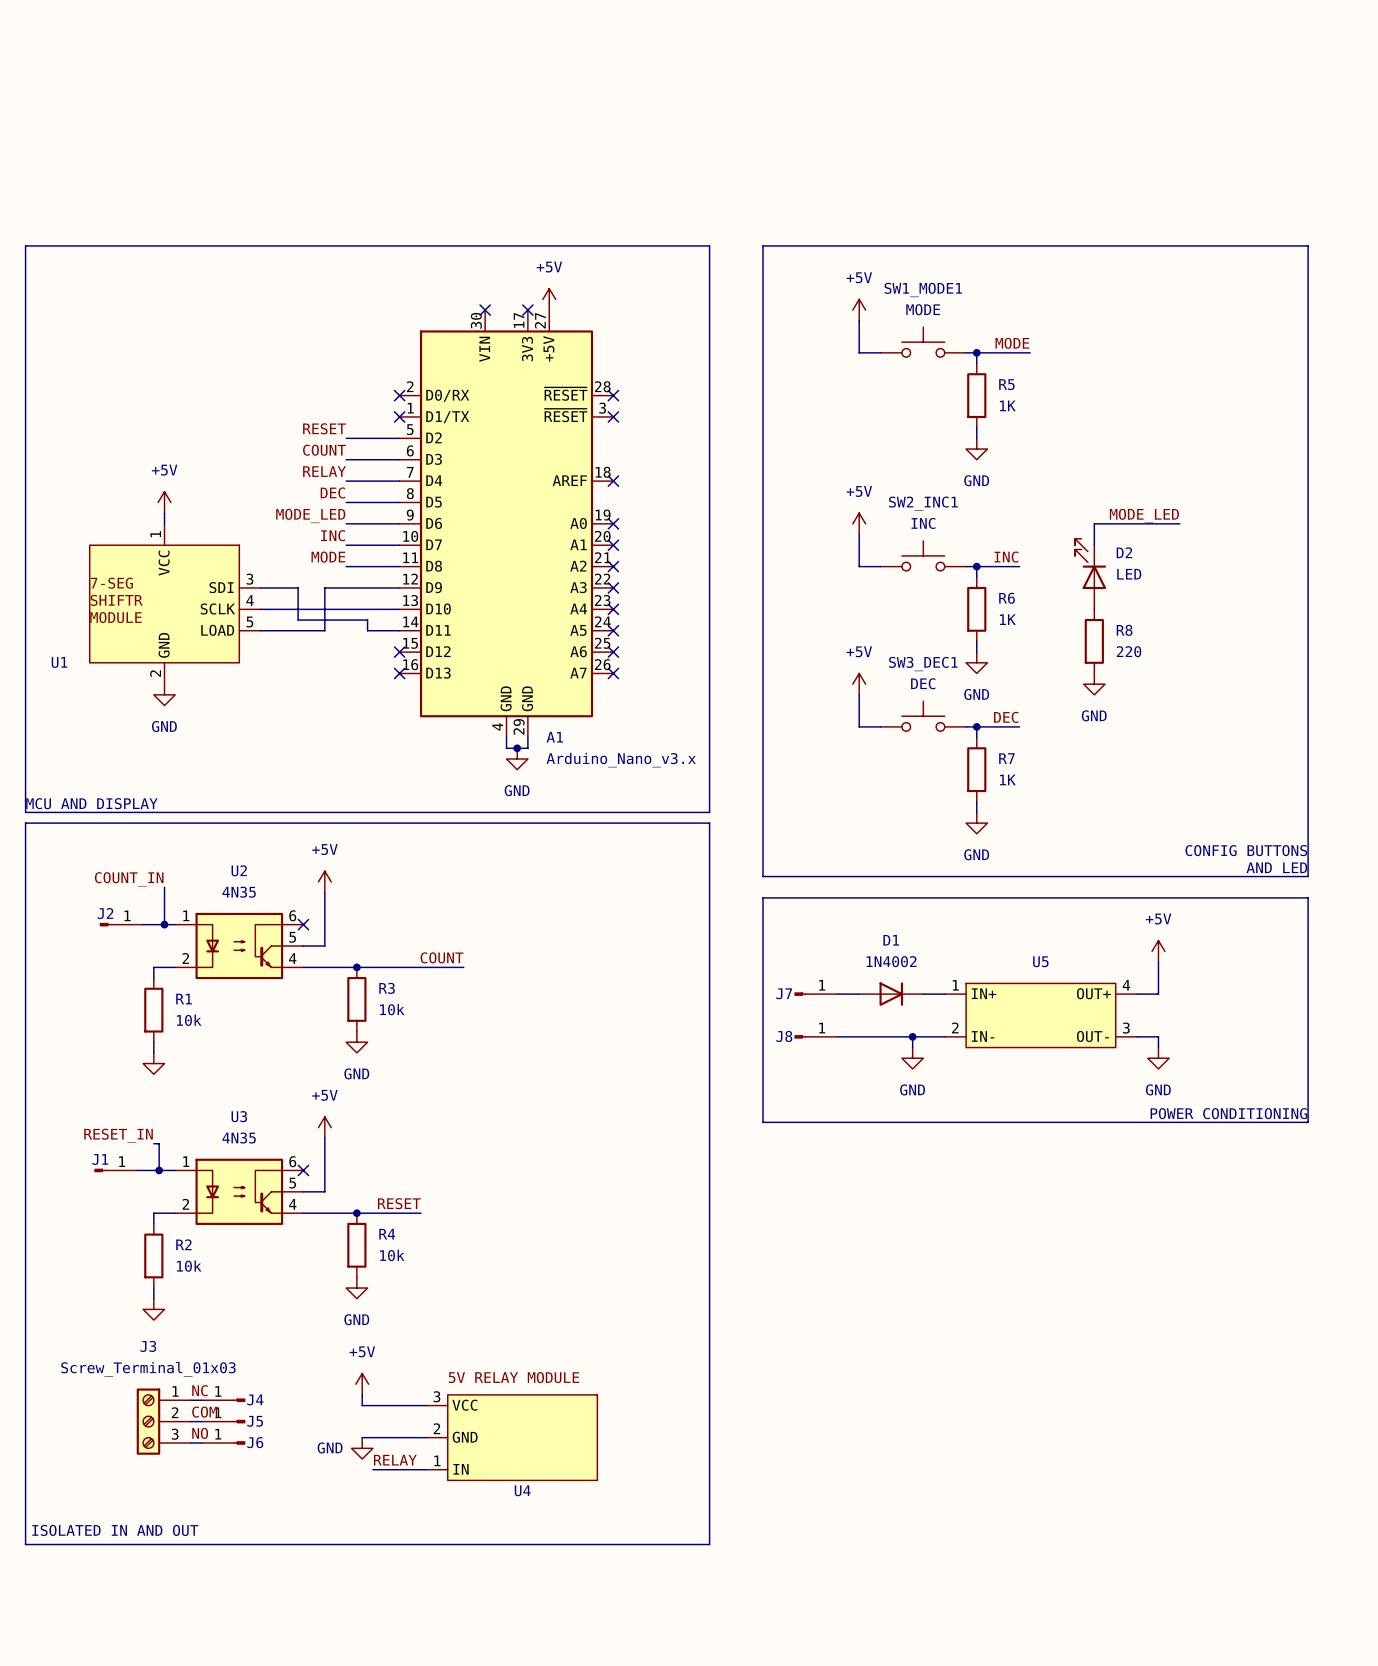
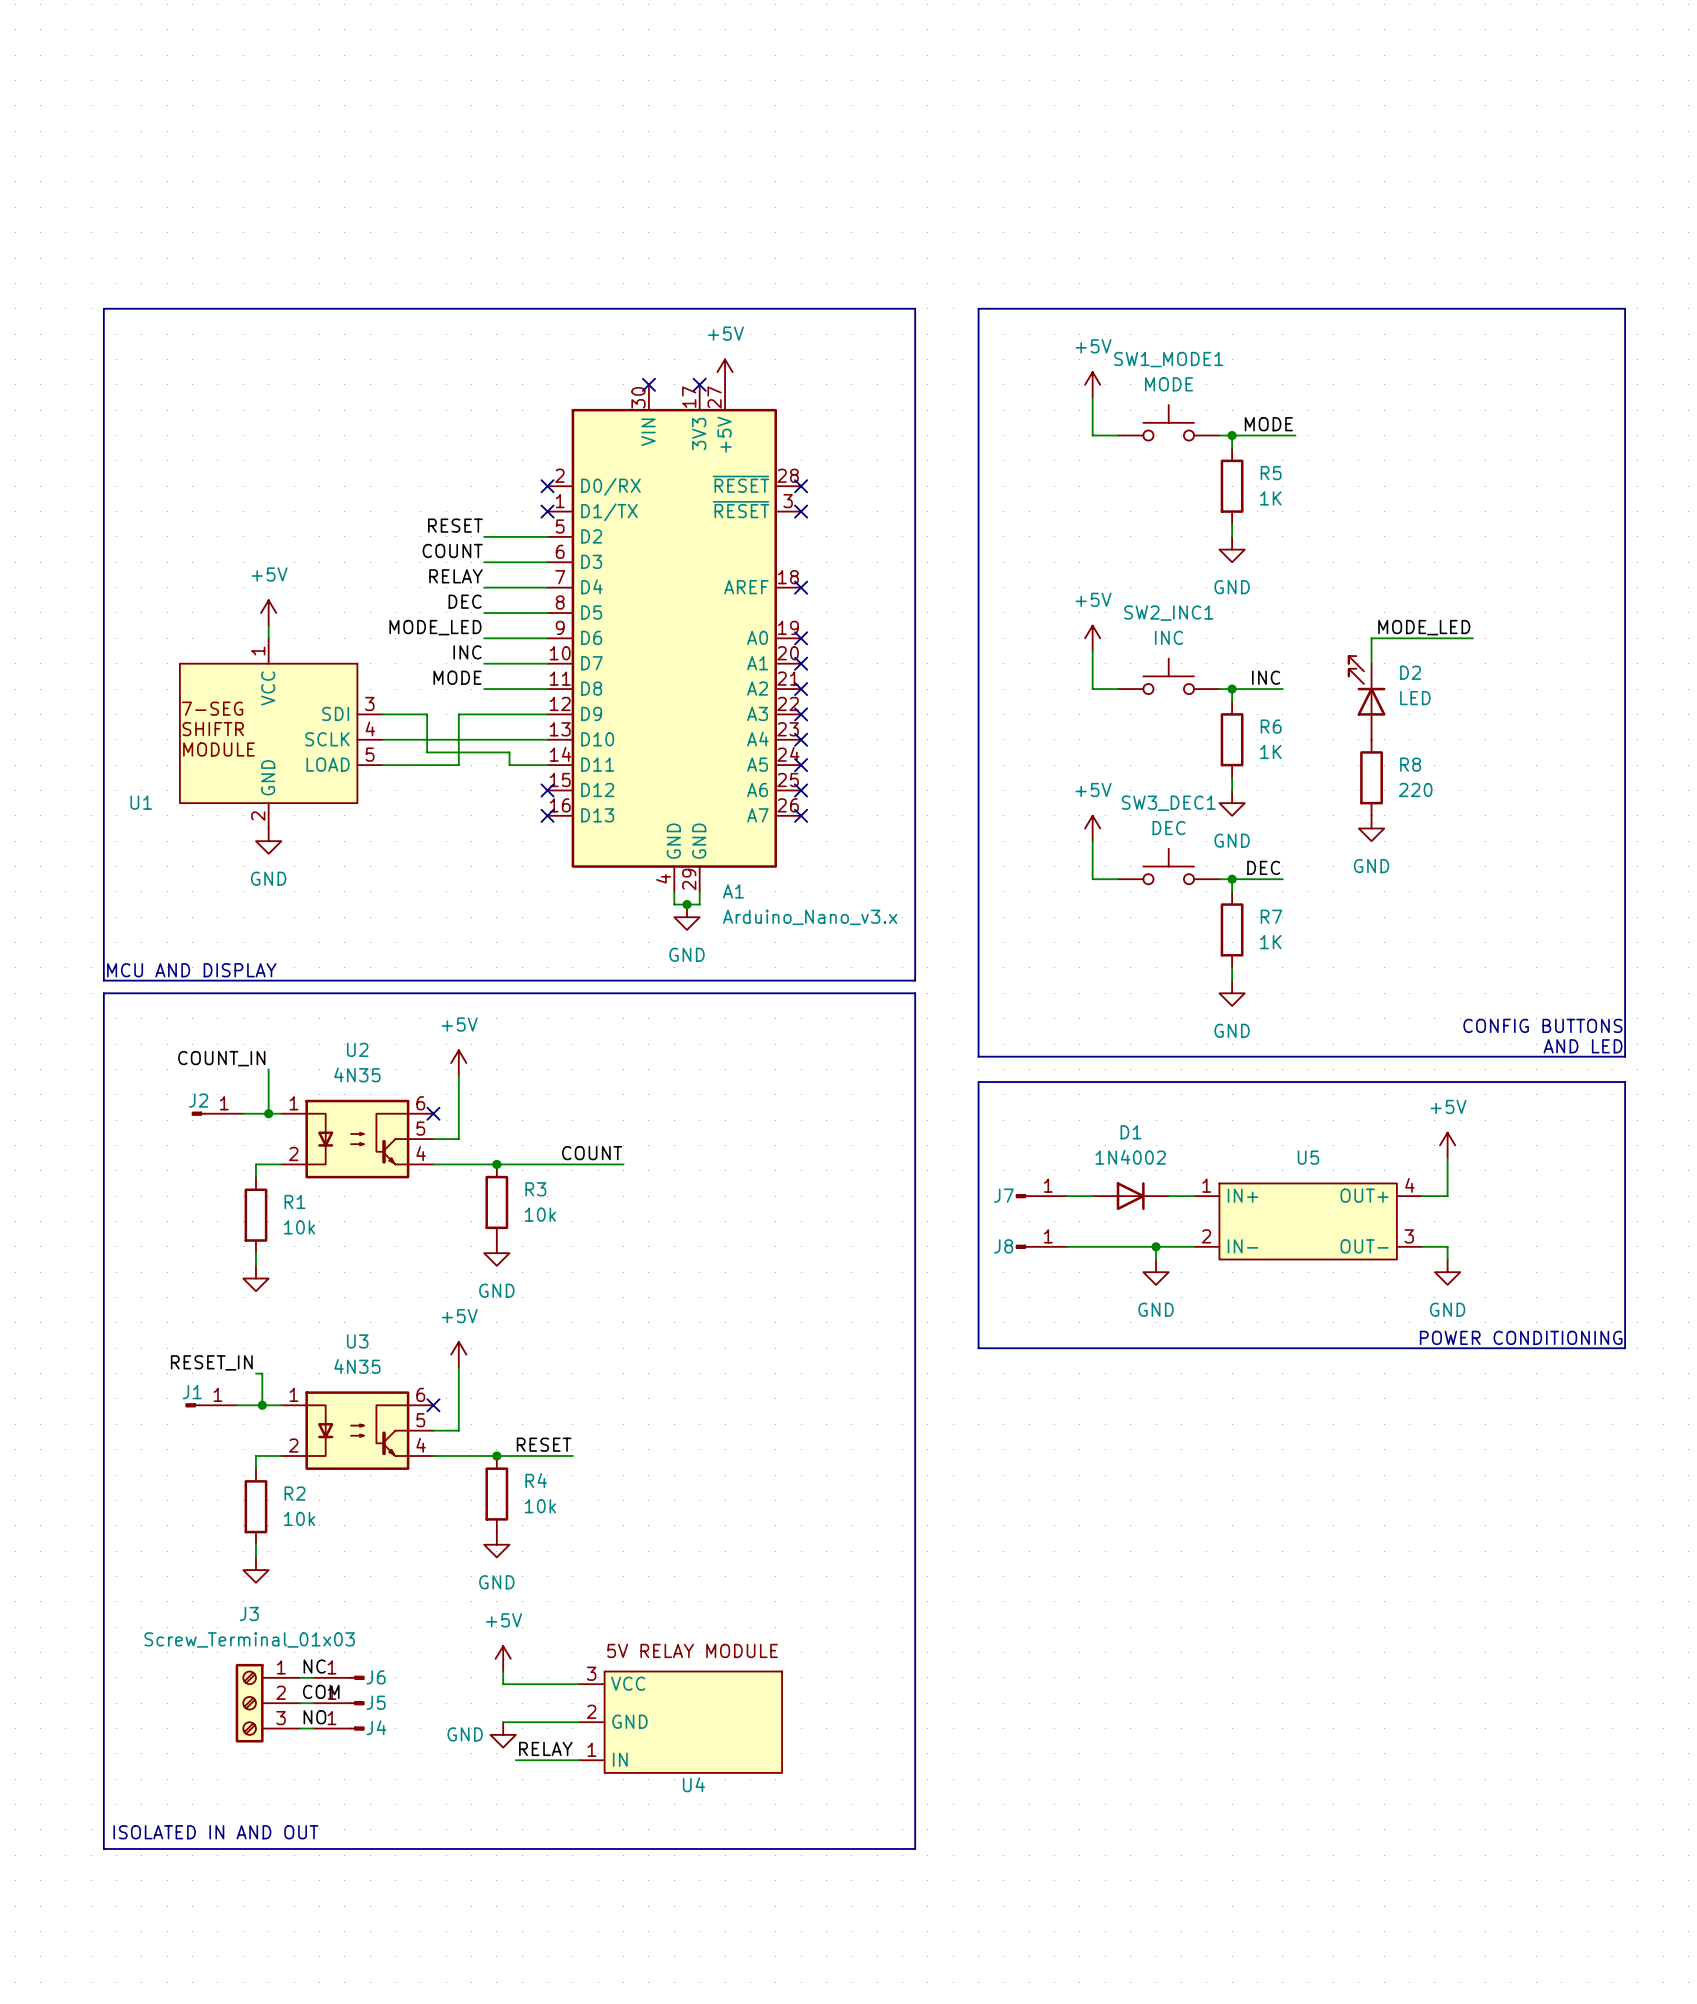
J4 name: J4 (255, 1399) -> J6 (376, 1677)
J6 name: J6 (255, 1442) -> J4 (376, 1727)

